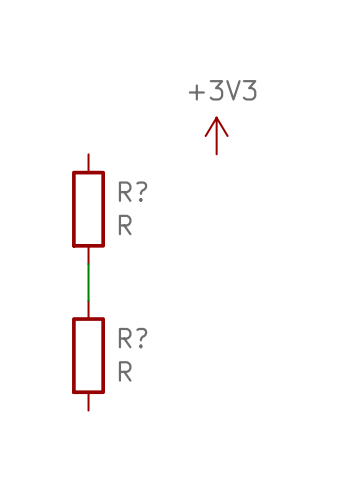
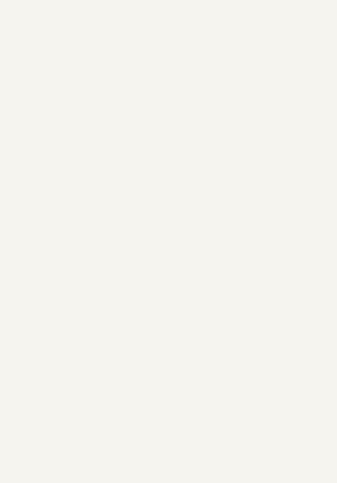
power symbol: +3V3 (216, 136) -> none
R?: R (88, 209) -> none
wire: (88, 264) (88, 300) -> none
R?: R (88, 355) -> none

